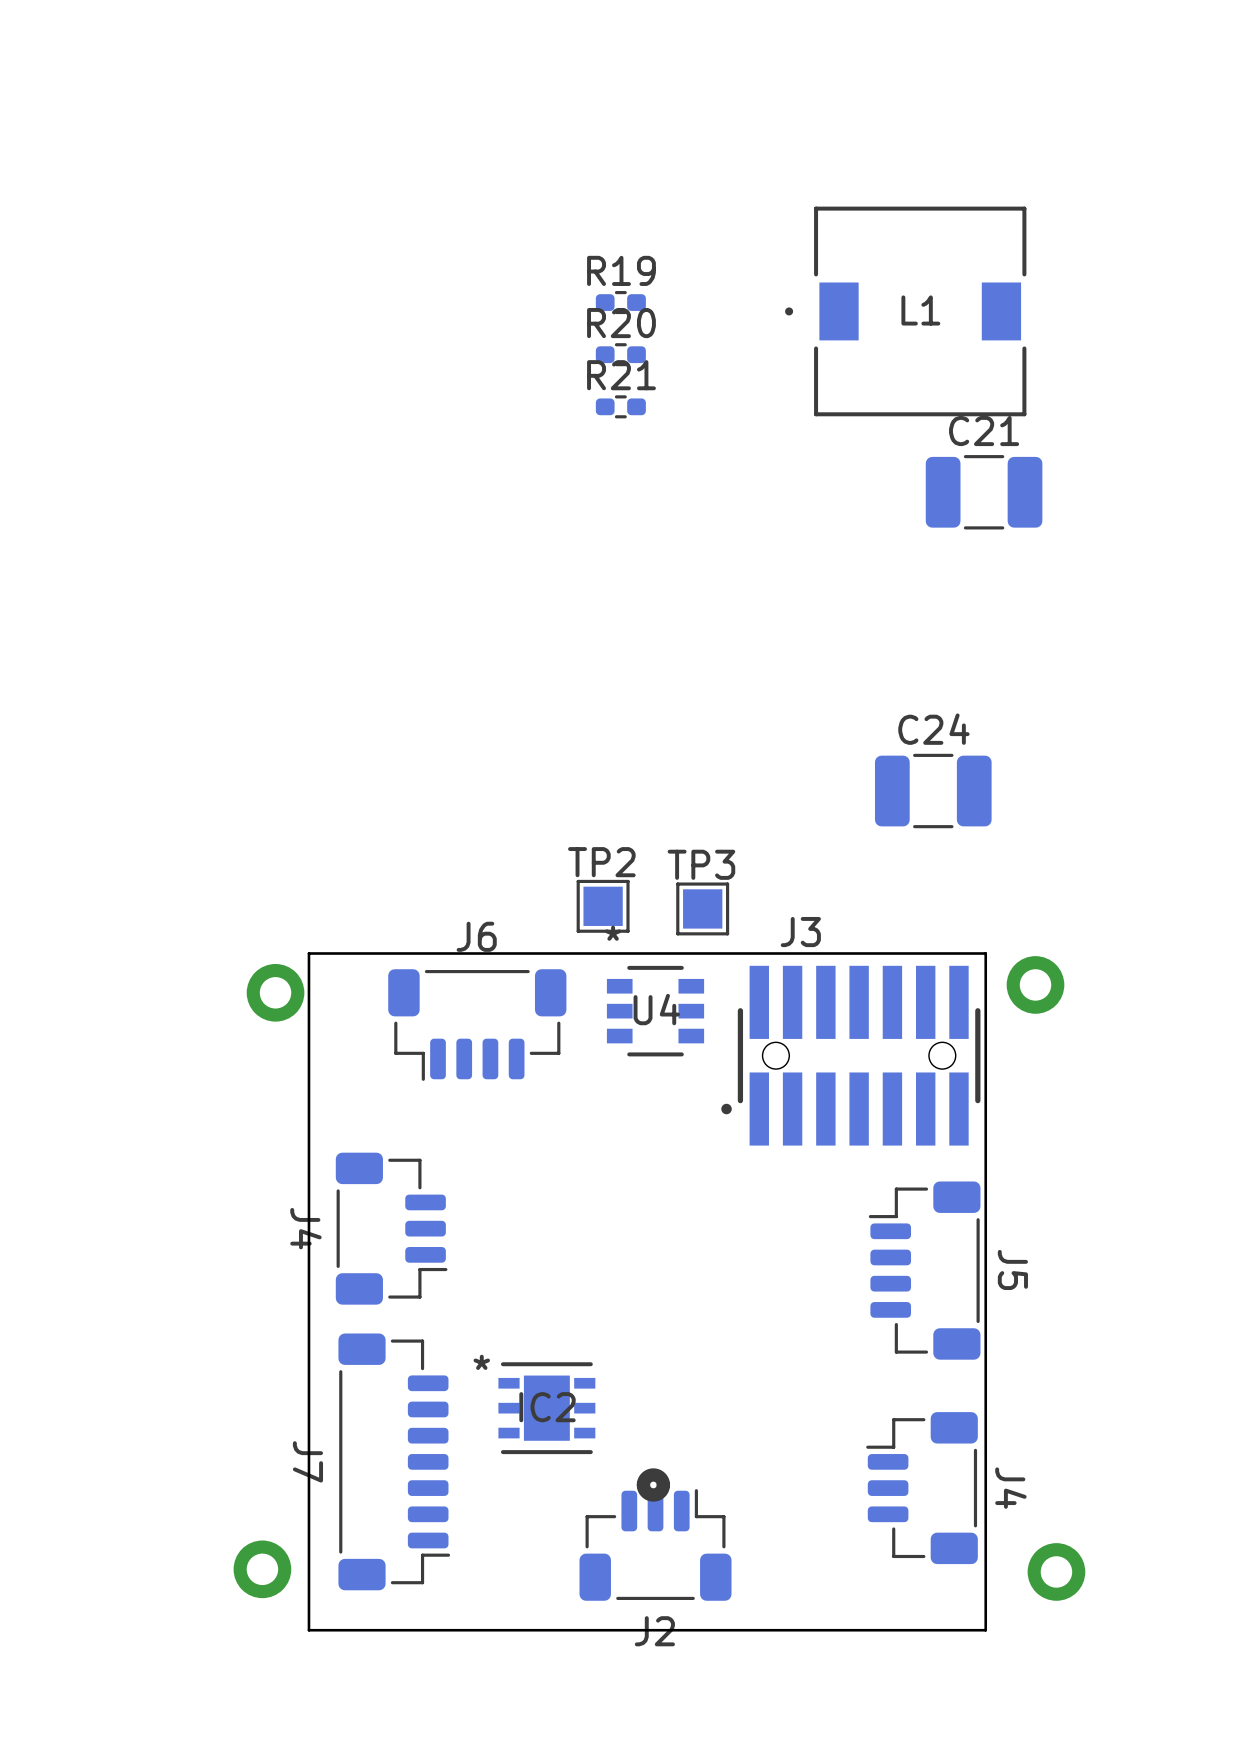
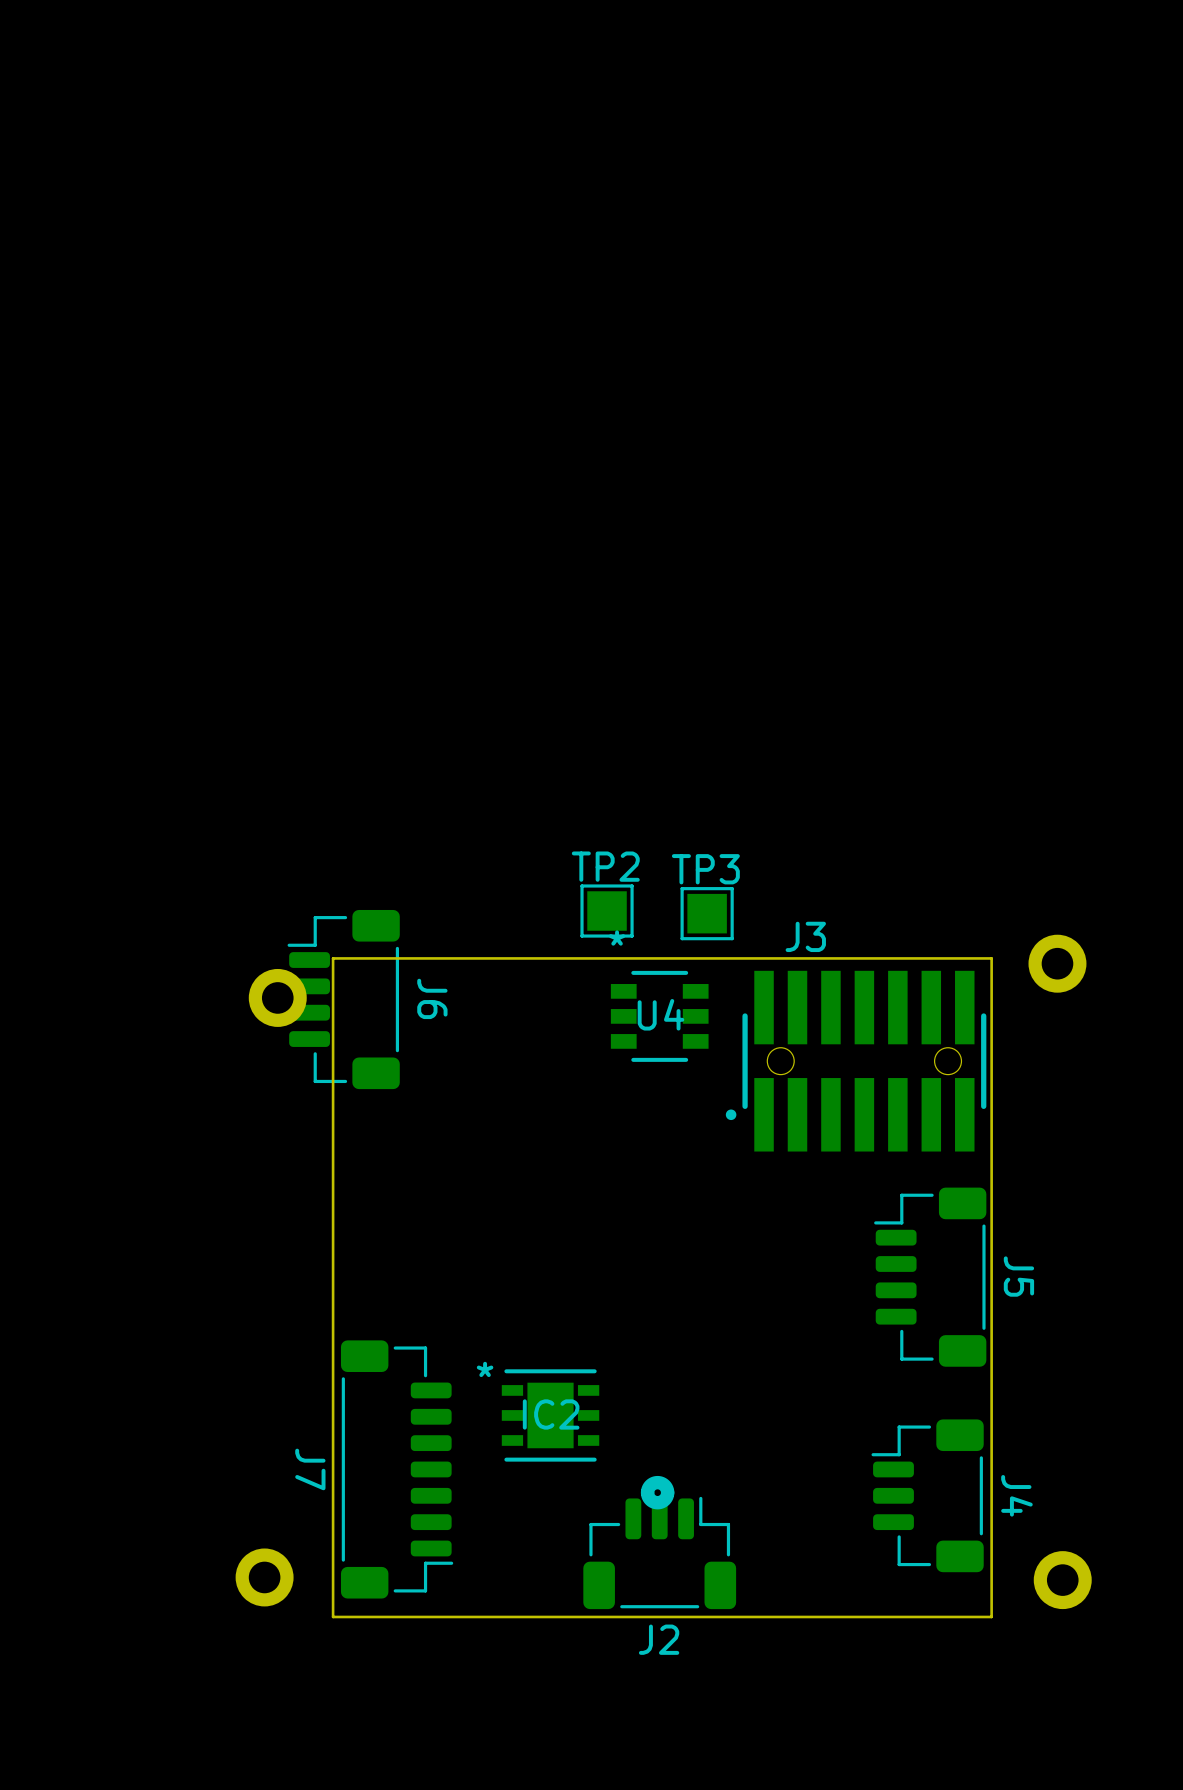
R19: (620, 302) -> none
L1: (905, 311) -> none
R20: (620, 354) -> none
R21: (620, 406) -> none
C21: (984, 492) -> none
C24: (933, 791) -> none
board edge: (330, 953) (308, 953) (308, 1630) (985, 1630) (985, 1608) -> (333, 958) (333, 1616) (991, 1616)
part position: (1035, 984) -> (1057, 963)
J6 rotation: 0° (477, 1025) -> 90° clockwise (343, 999)
J6 position: (477, 1025) -> (343, 999)
J4: (391, 1228) -> none

